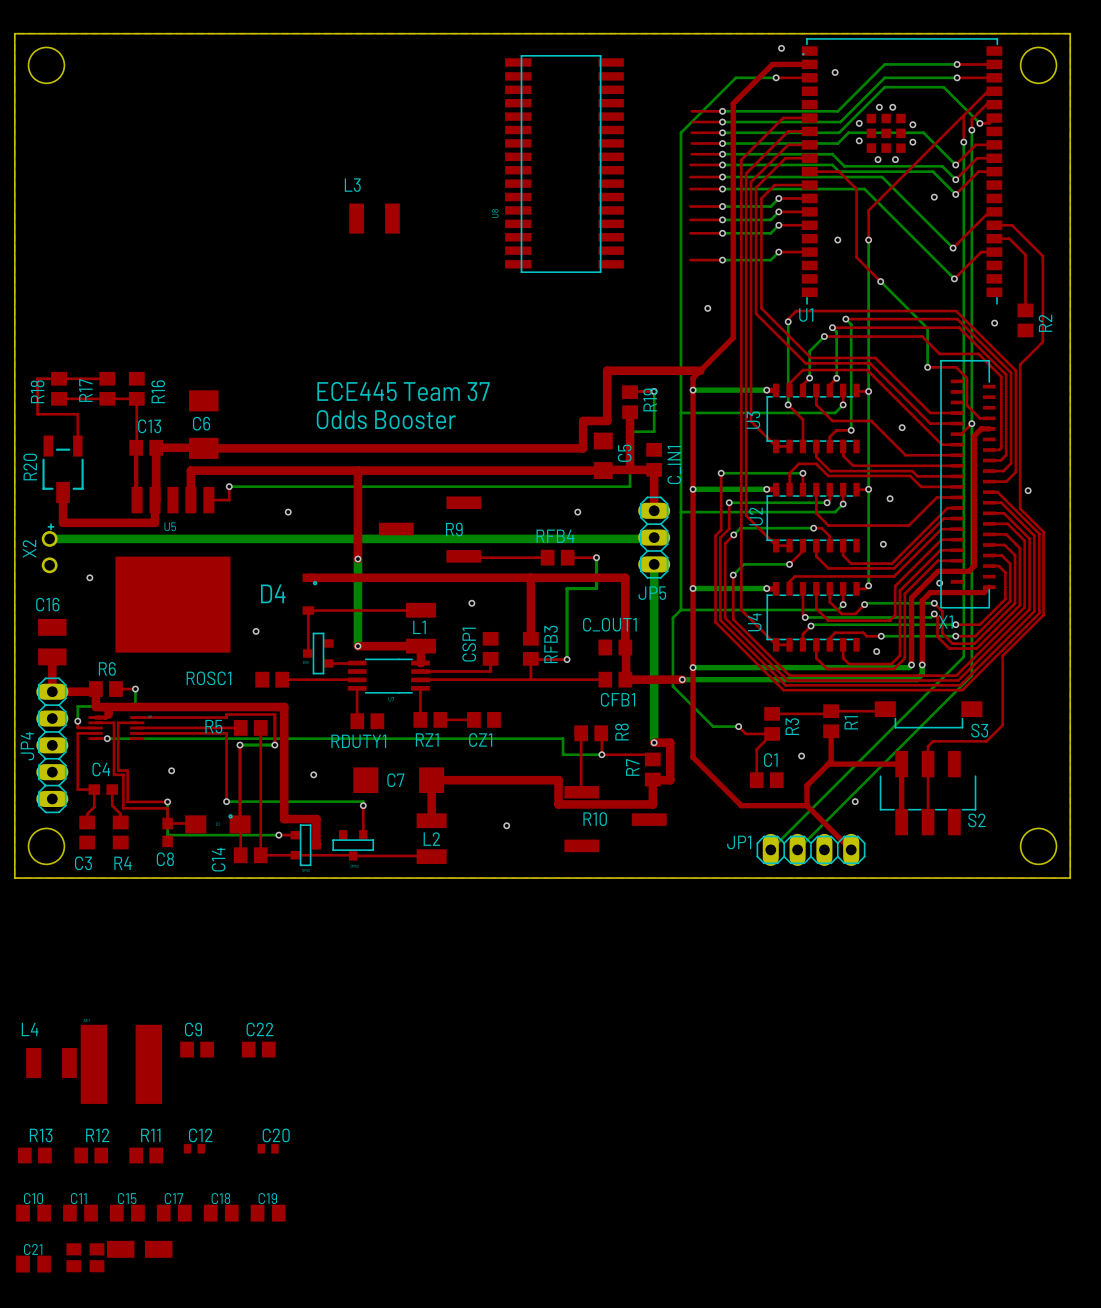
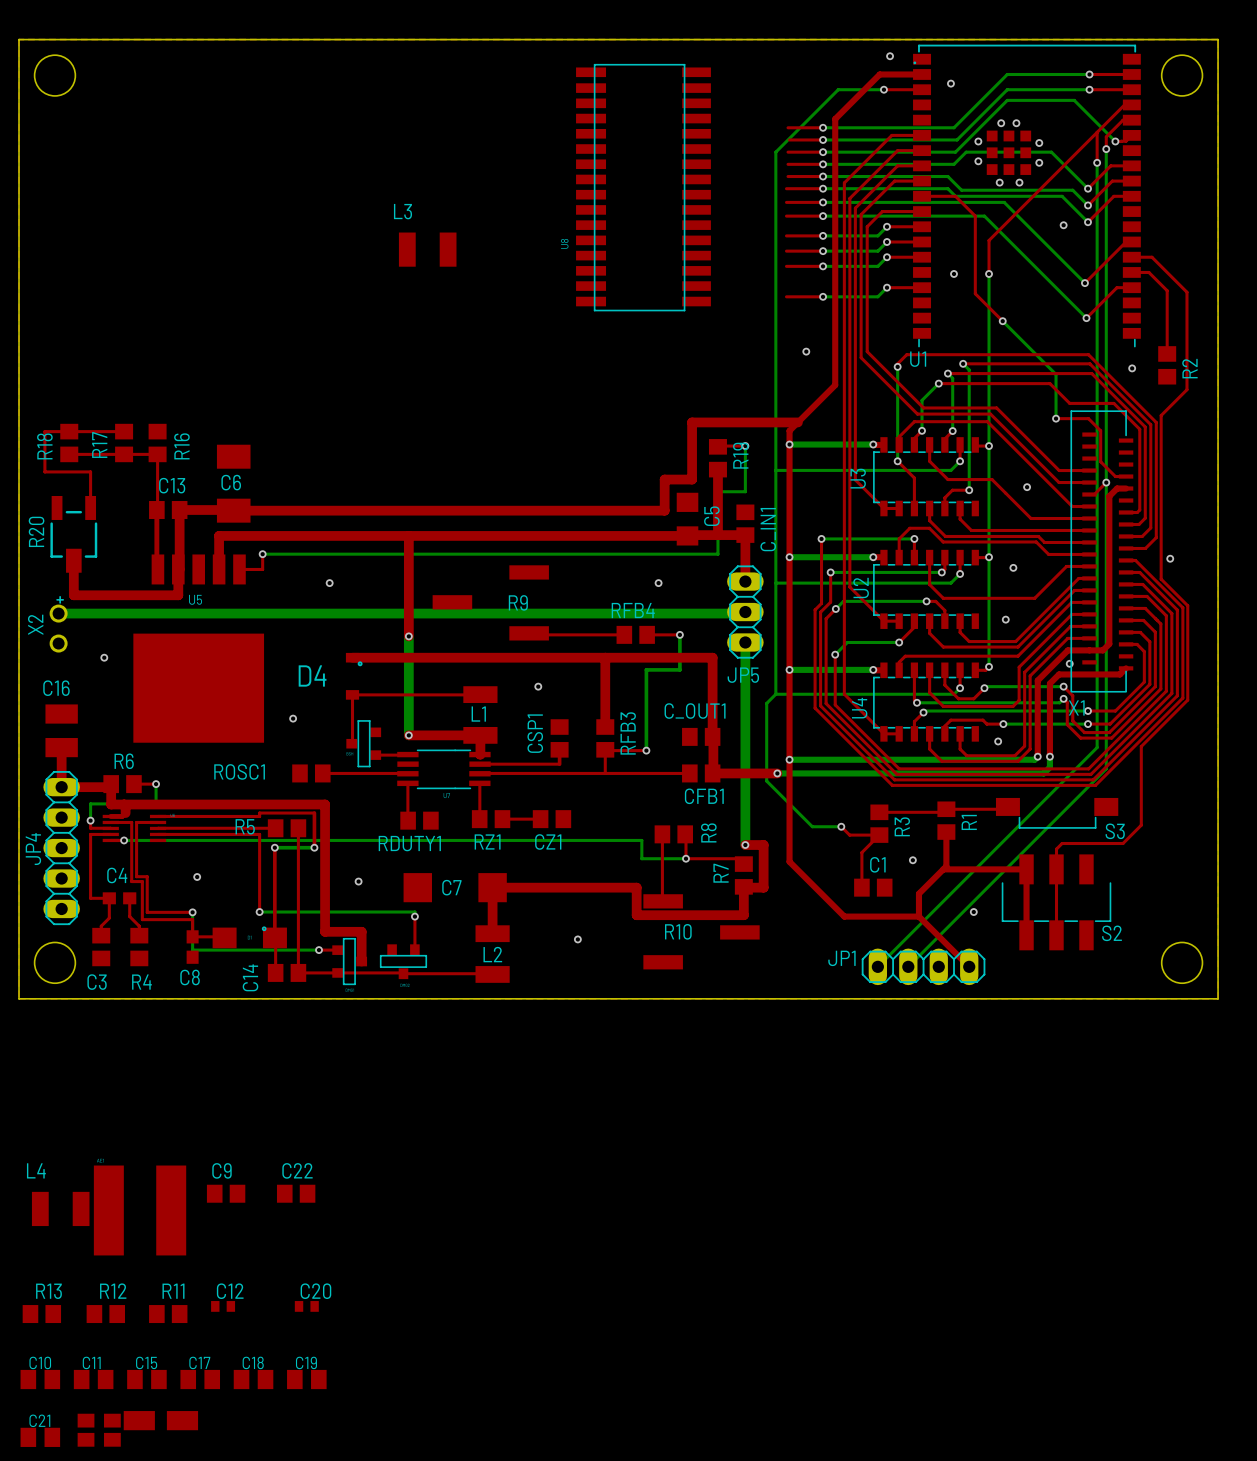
text: ECE445 Team 37 (403, 391) -> none
text: Odds Booster (386, 419) -> none

